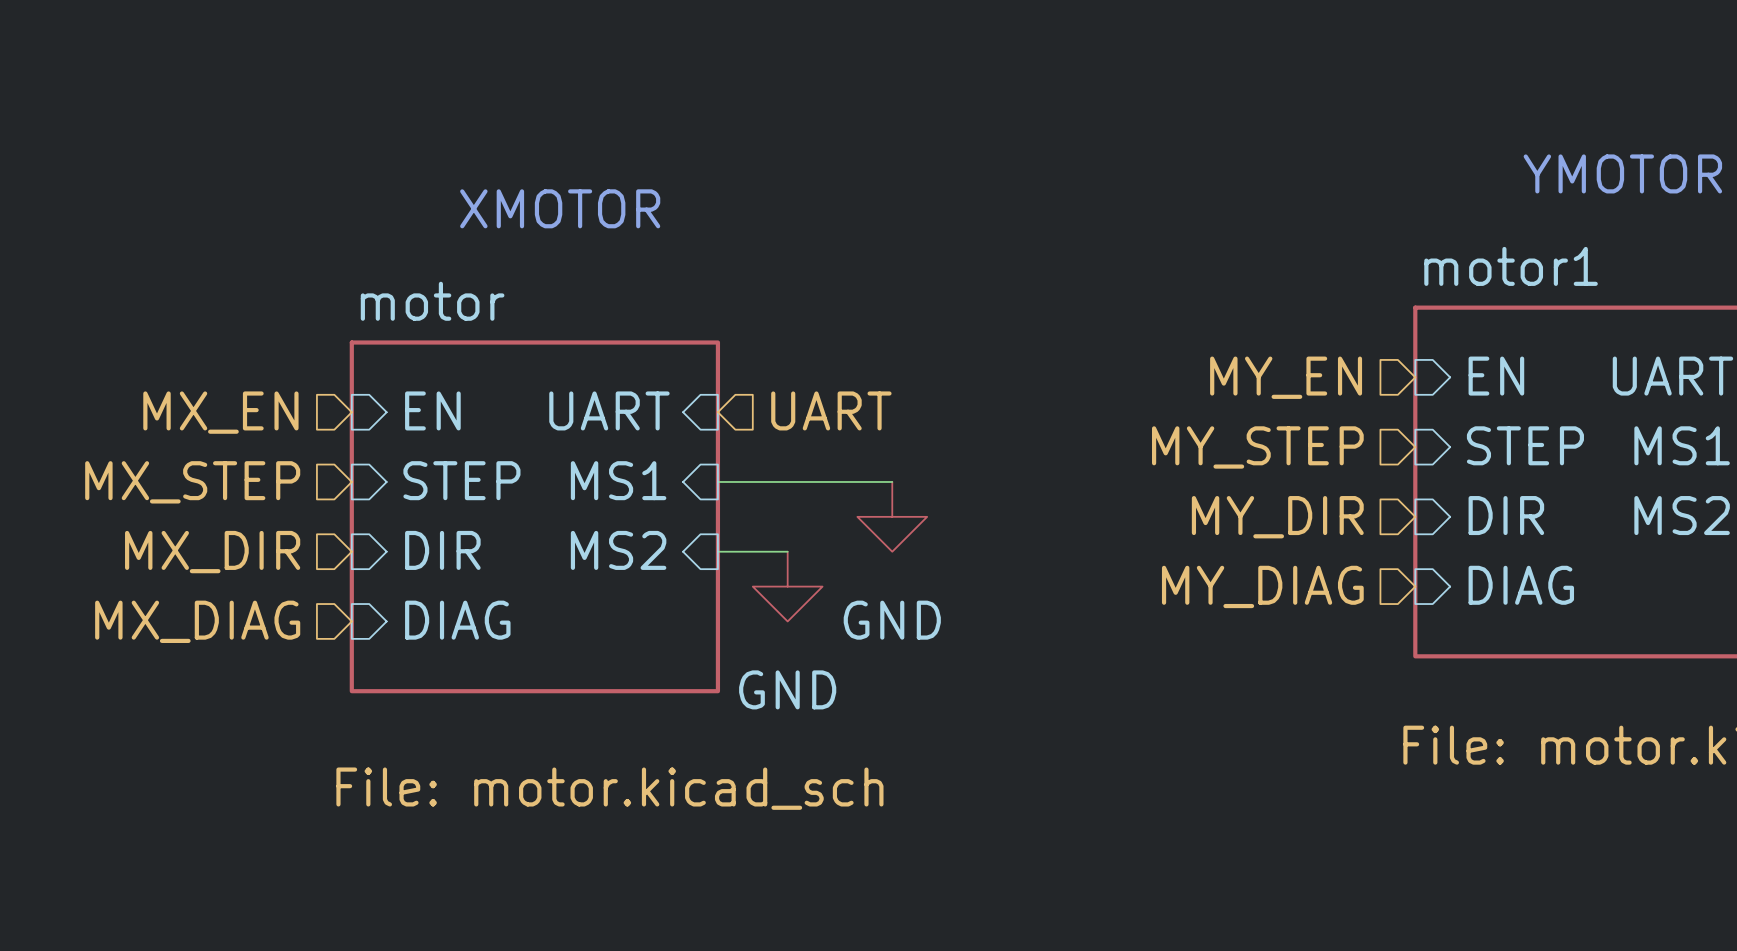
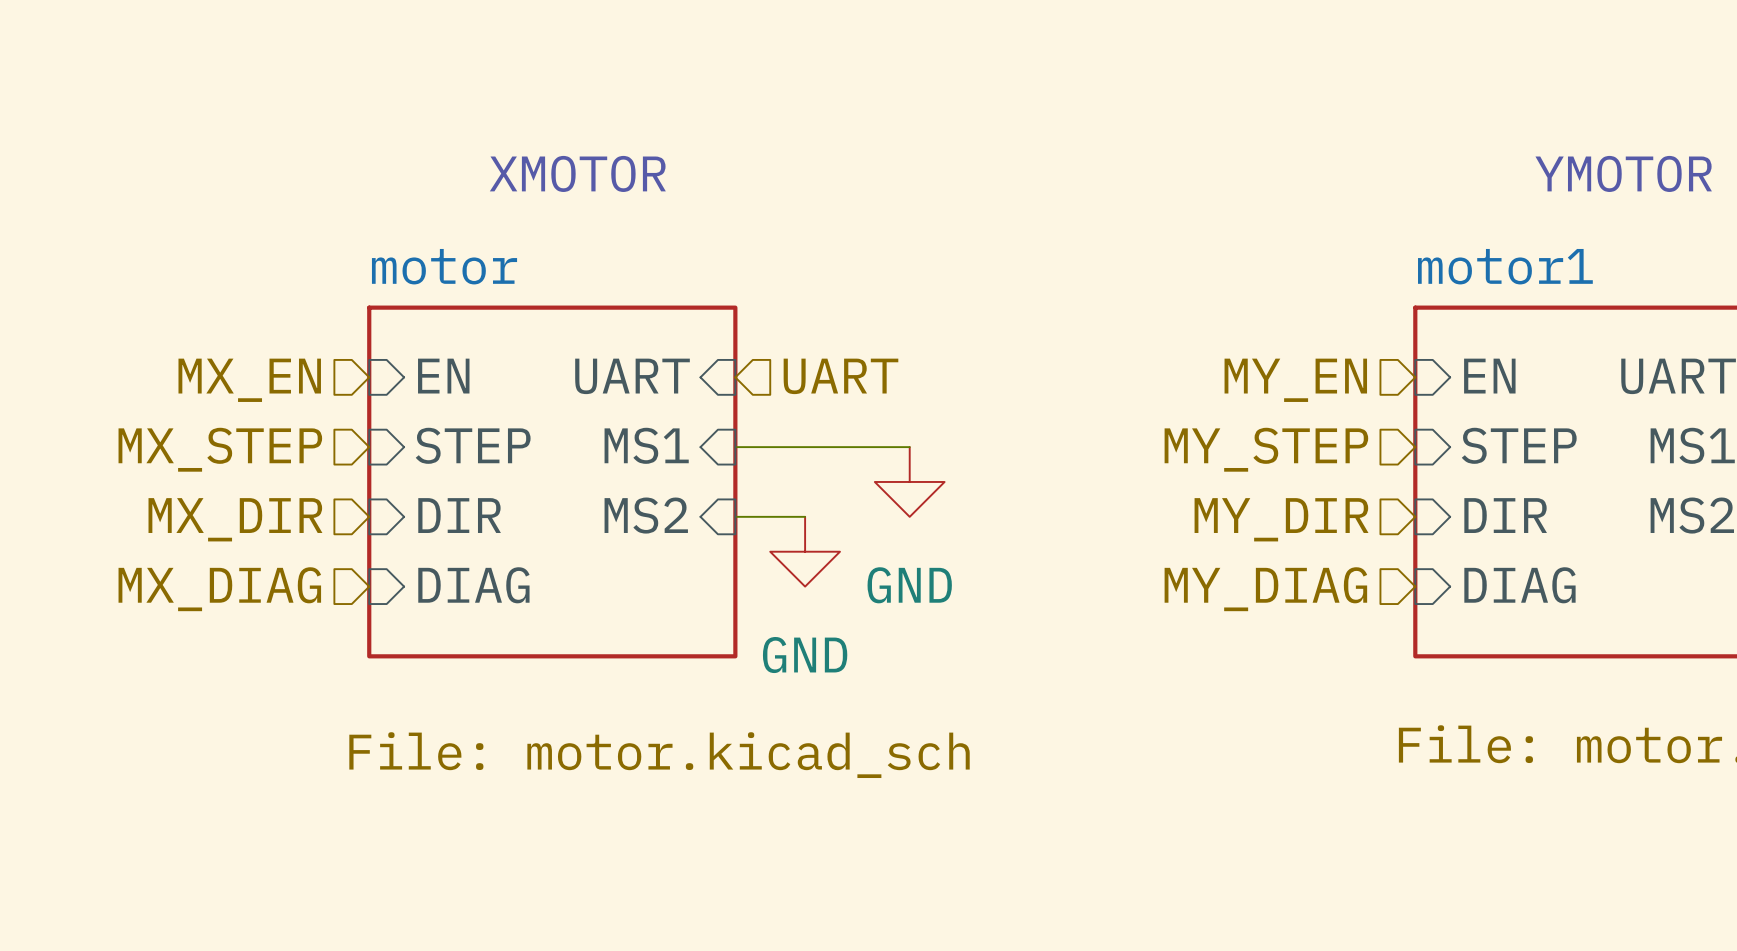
text position: XMOTOR (560, 208) -> XMOTOR (577, 173)
sheet pin position: EN (432, 410) -> EN (443, 376)
sheet pin position: UART (609, 410) -> UART (632, 376)
hierarchical label position: UART (831, 410) -> UART (840, 376)
hierarchical label position: MX_EN (220, 412) -> MX_EN (249, 380)
sheet pin position: STEP (461, 480) -> STEP (473, 445)
sheet pin position: MS1 (618, 480) -> MS1 (646, 445)
wire: (717, 481) (892, 481) -> (735, 447) (909, 447)
hierarchical label position: MX_STEP (192, 482) -> MX_STEP (220, 449)
sheet motor position: (534, 516) -> (552, 481)
power symbol position: GND (892, 516) -> GND (909, 481)
sheet pin position: DIR (442, 550) -> DIR (459, 515)
sheet pin position: MS2 (618, 550) -> MS2 (646, 515)
wire: (717, 551) (787, 551) -> (735, 516) (805, 516)
hierarchical label position: MX_DIR (212, 552) -> MX_DIR (235, 519)
power symbol position: GND (787, 586) -> GND (805, 551)
sheet pin position: DIAG (457, 620) -> DIAG (473, 585)
hierarchical label position: MX_DIAG (197, 621) -> MX_DIAG (219, 589)

